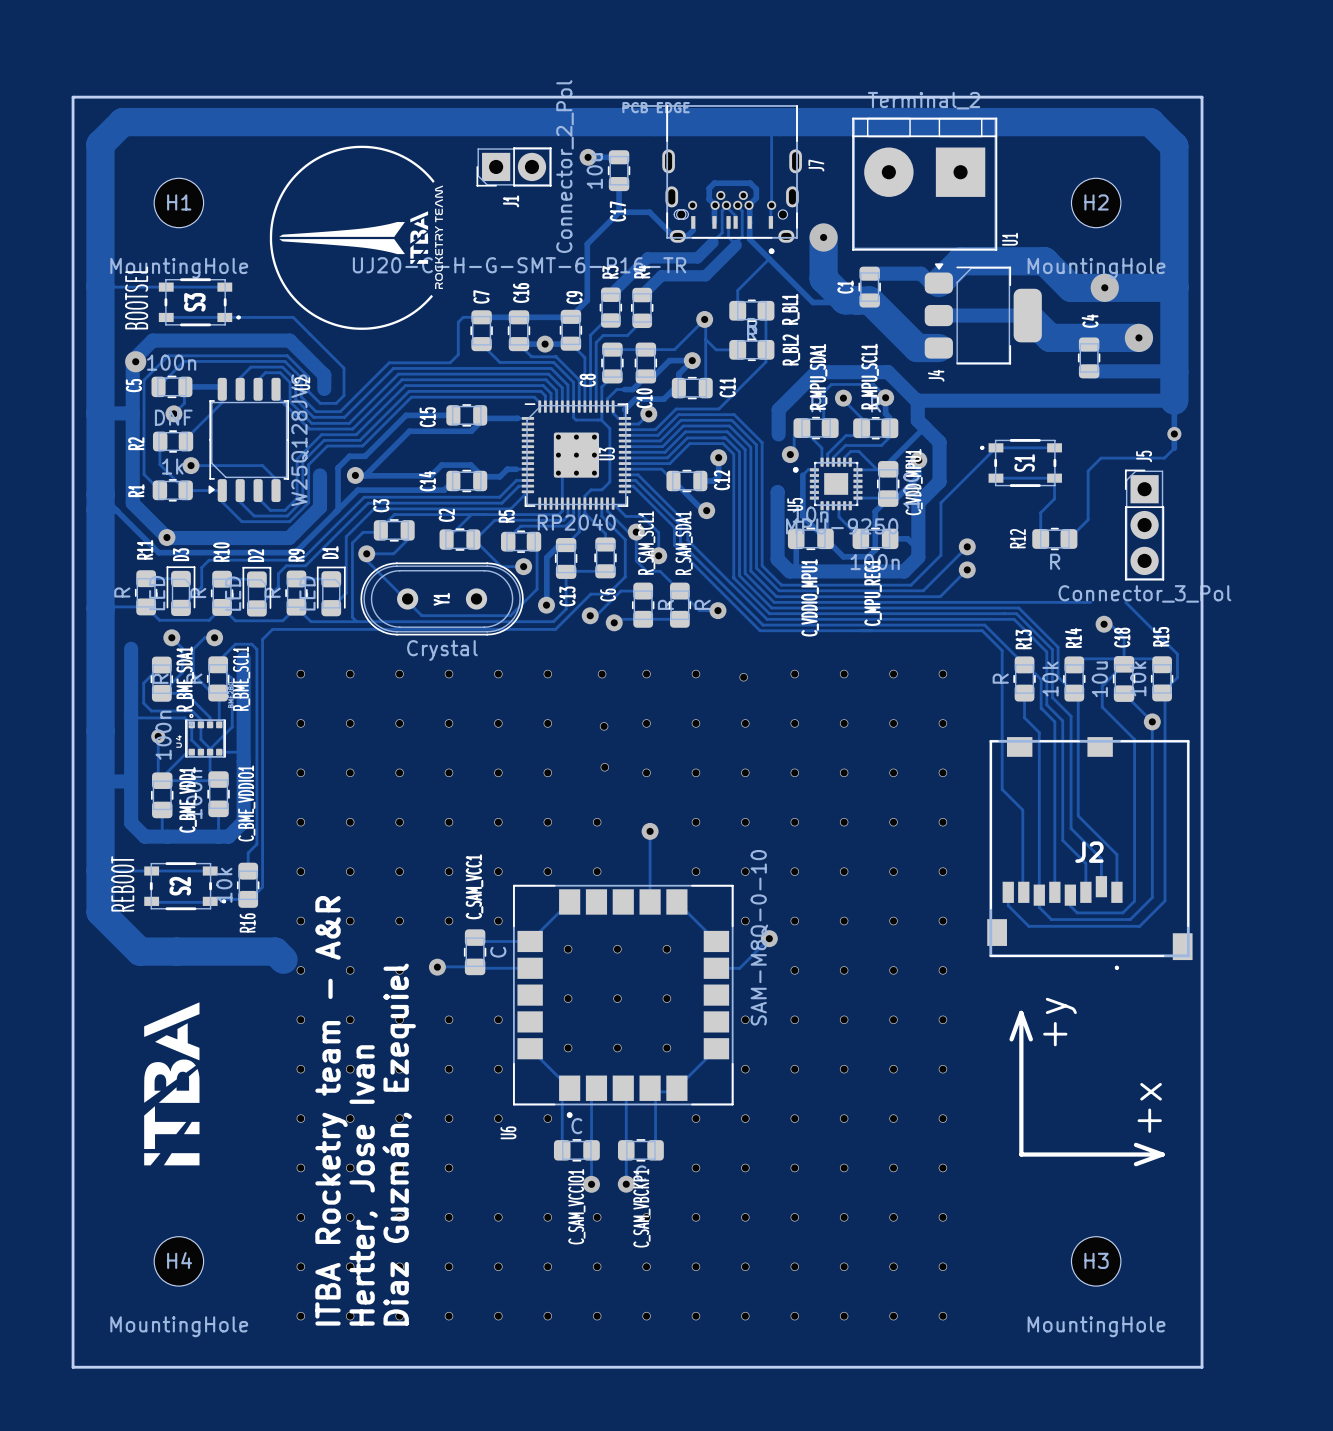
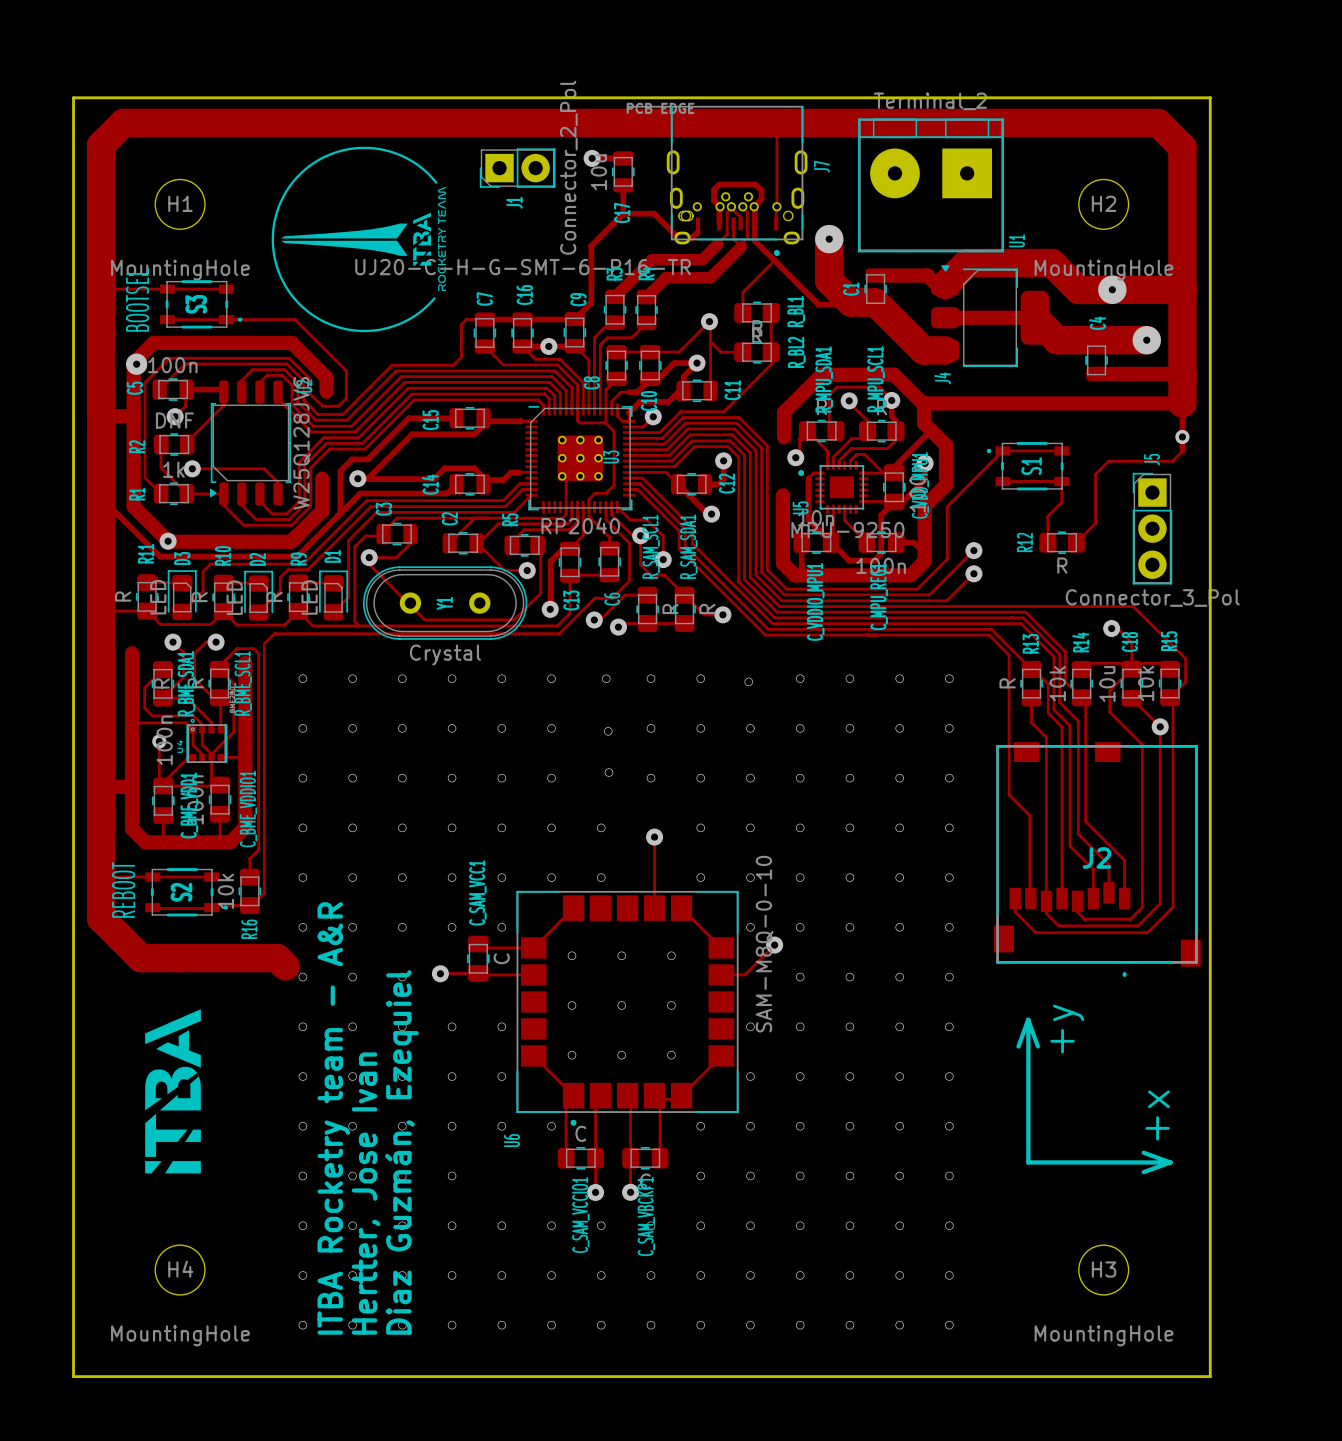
track: none -> (1098, 606) (1133, 606)

